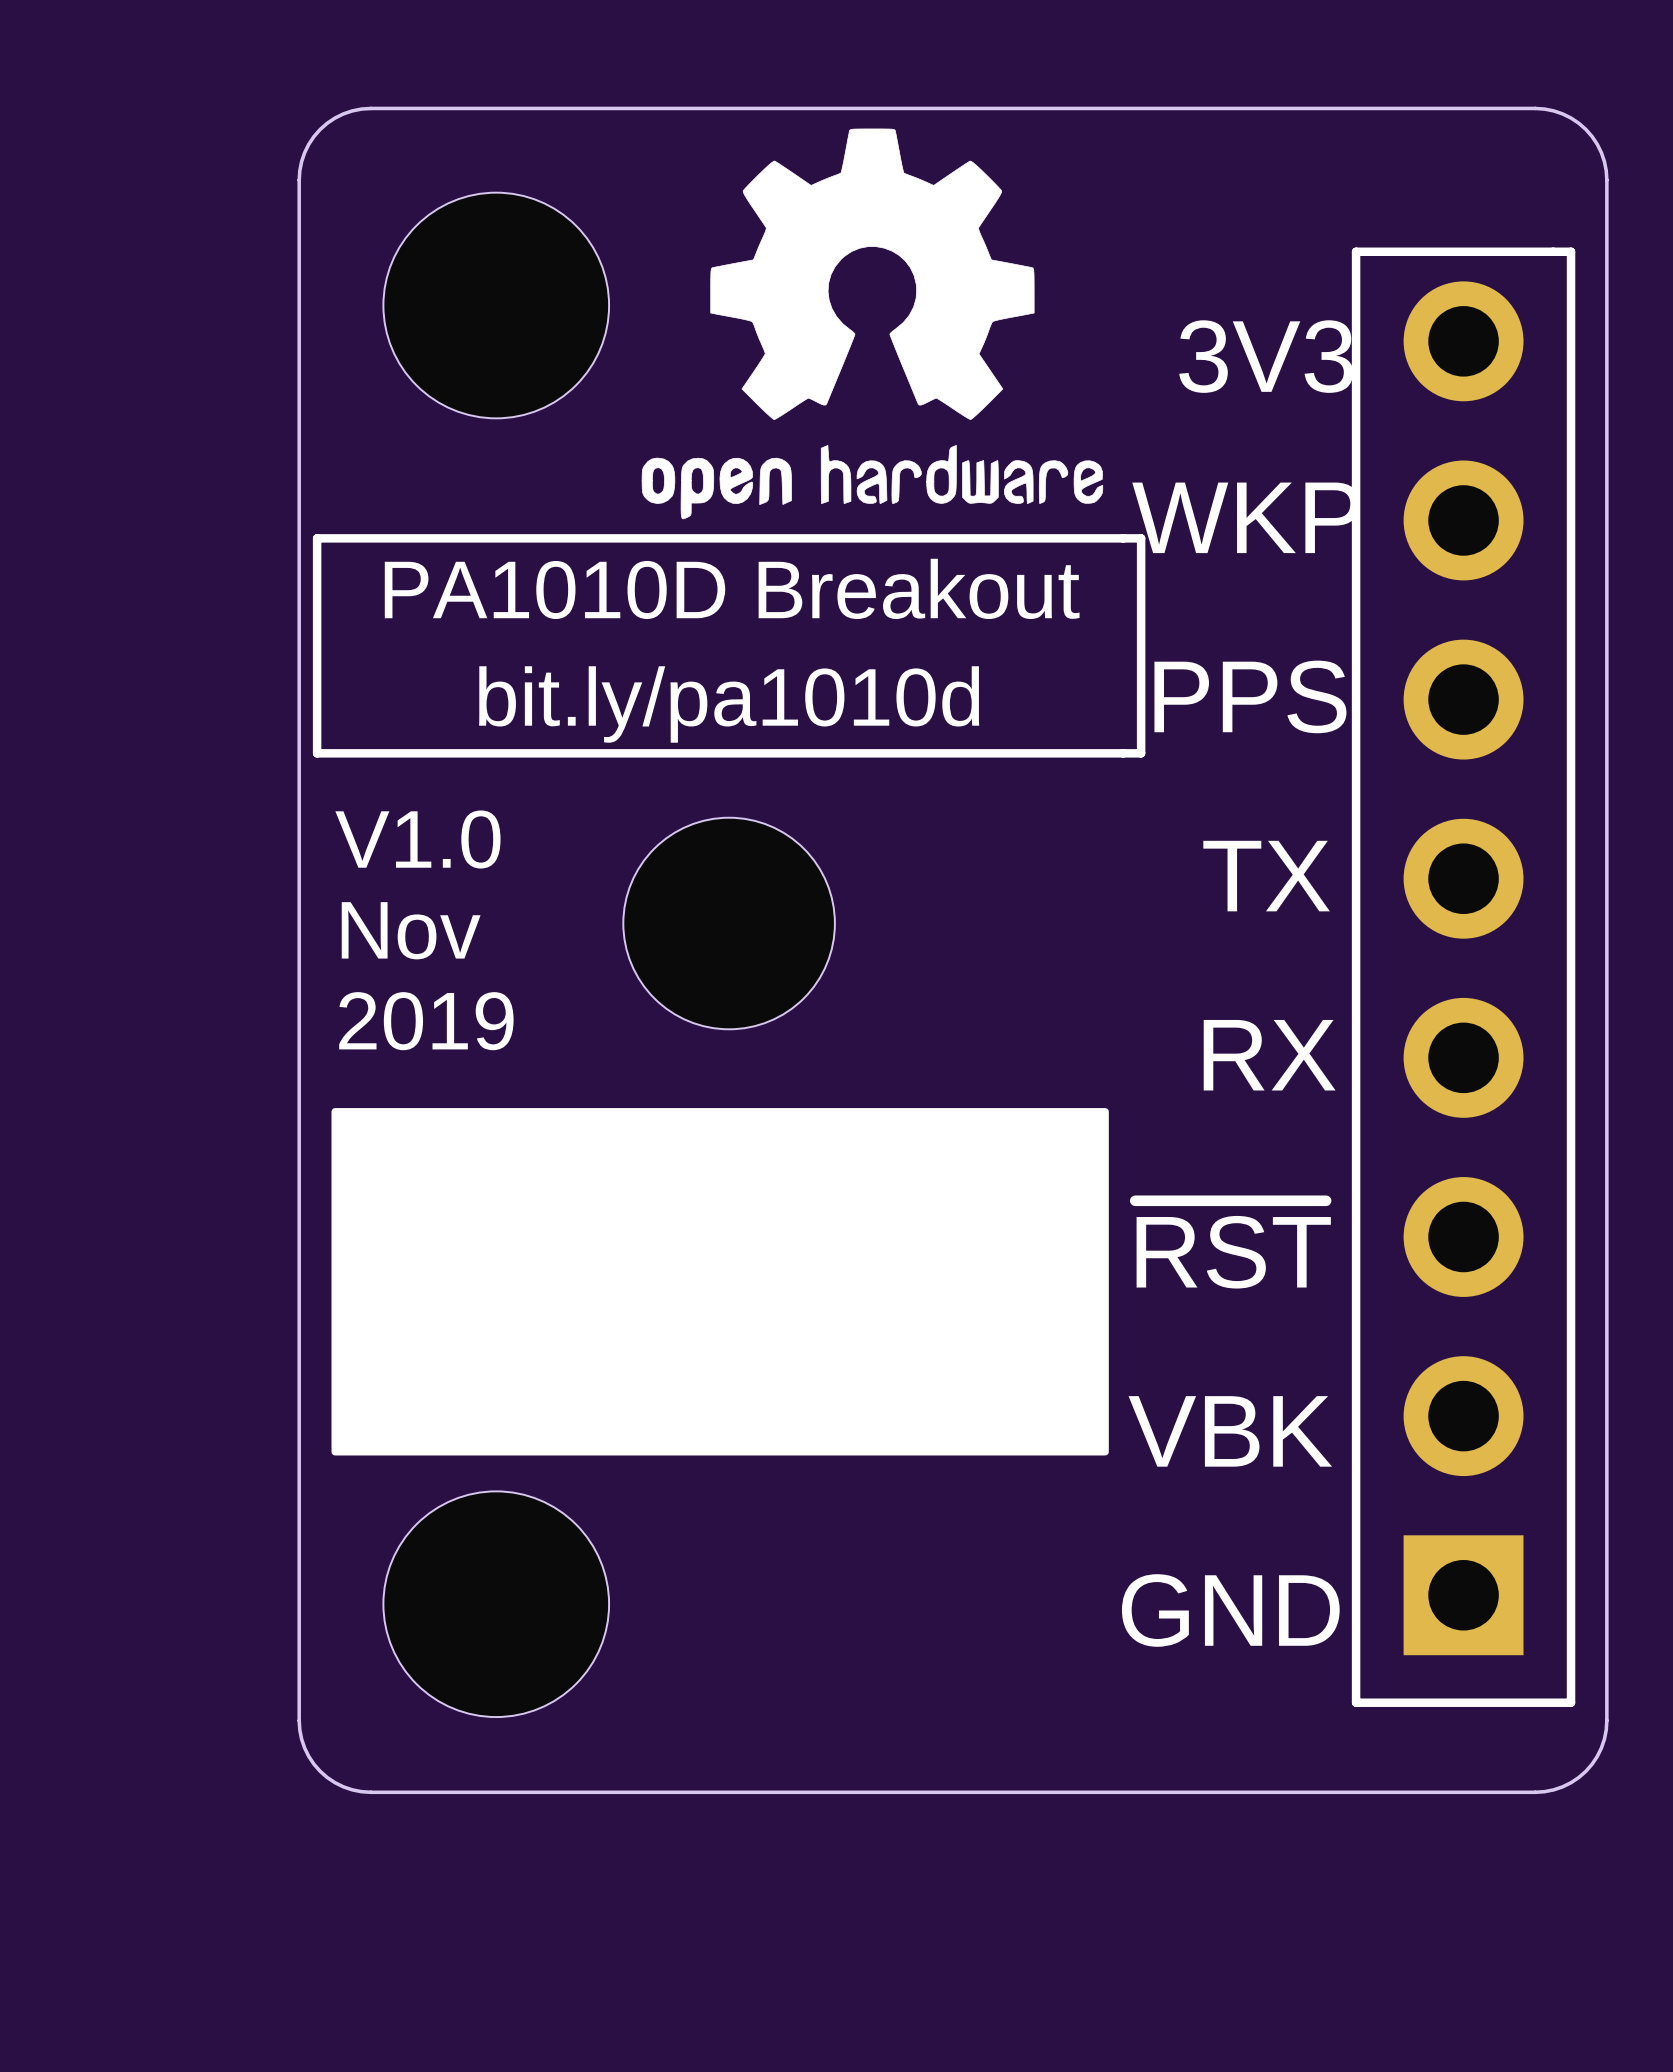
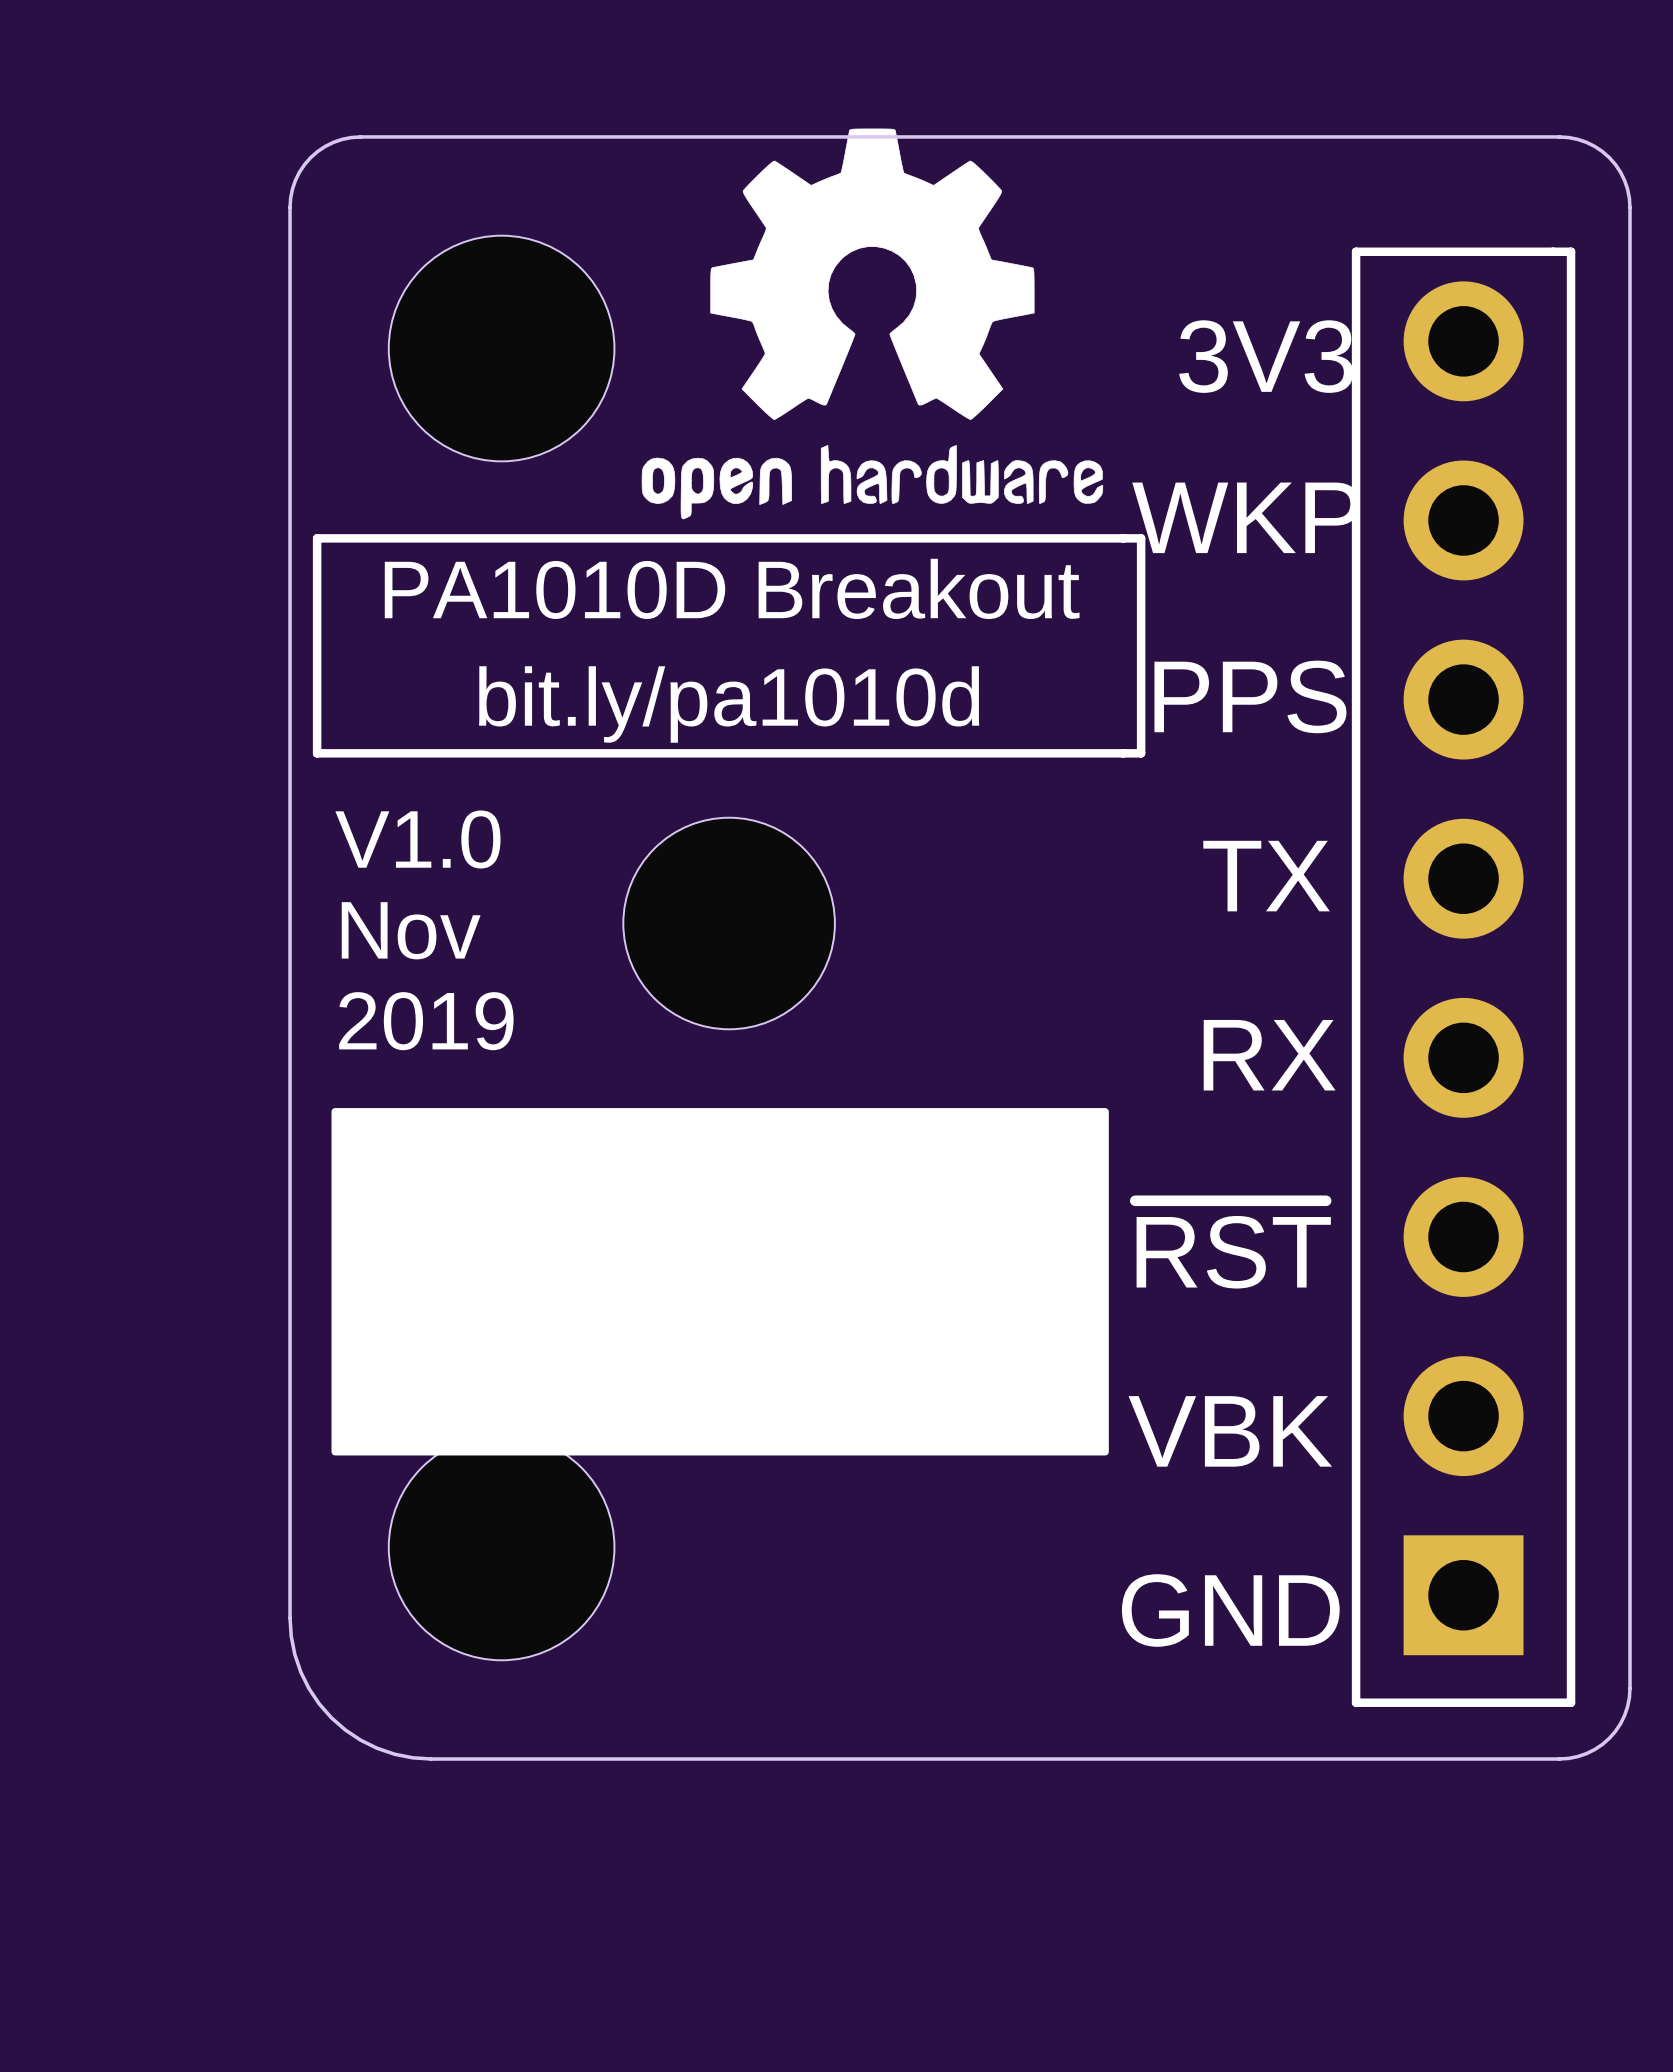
board edge: (1535, 108) (370, 108) (352, 110) (335, 118) (314, 136) (304, 152) (299, 180) (299, 1720) (301, 1739) (308, 1756) (327, 1777) (343, 1786) (370, 1792) (1535, 1792) (1553, 1789) (1571, 1782) (1592, 1764) (1601, 1748) (1606, 1720) (1606, 180) (1601, 152) (1585, 129) (1562, 113) (1535, 108) -> (1559, 136) (1586, 142) (1609, 157) (1624, 180) (1629, 207) (1629, 1688) (1624, 1715) (1615, 1731) (1602, 1744) (1586, 1753) (1559, 1759) (431, 1759) (394, 1754) (377, 1748) (345, 1729) (319, 1703) (308, 1688) (294, 1654) (290, 1617) (290, 207) (295, 180) (304, 164) (317, 151) (333, 142) (360, 136) (1559, 136)
part position: (496, 305) -> (501, 348)
part position: (496, 1604) -> (501, 1547)

